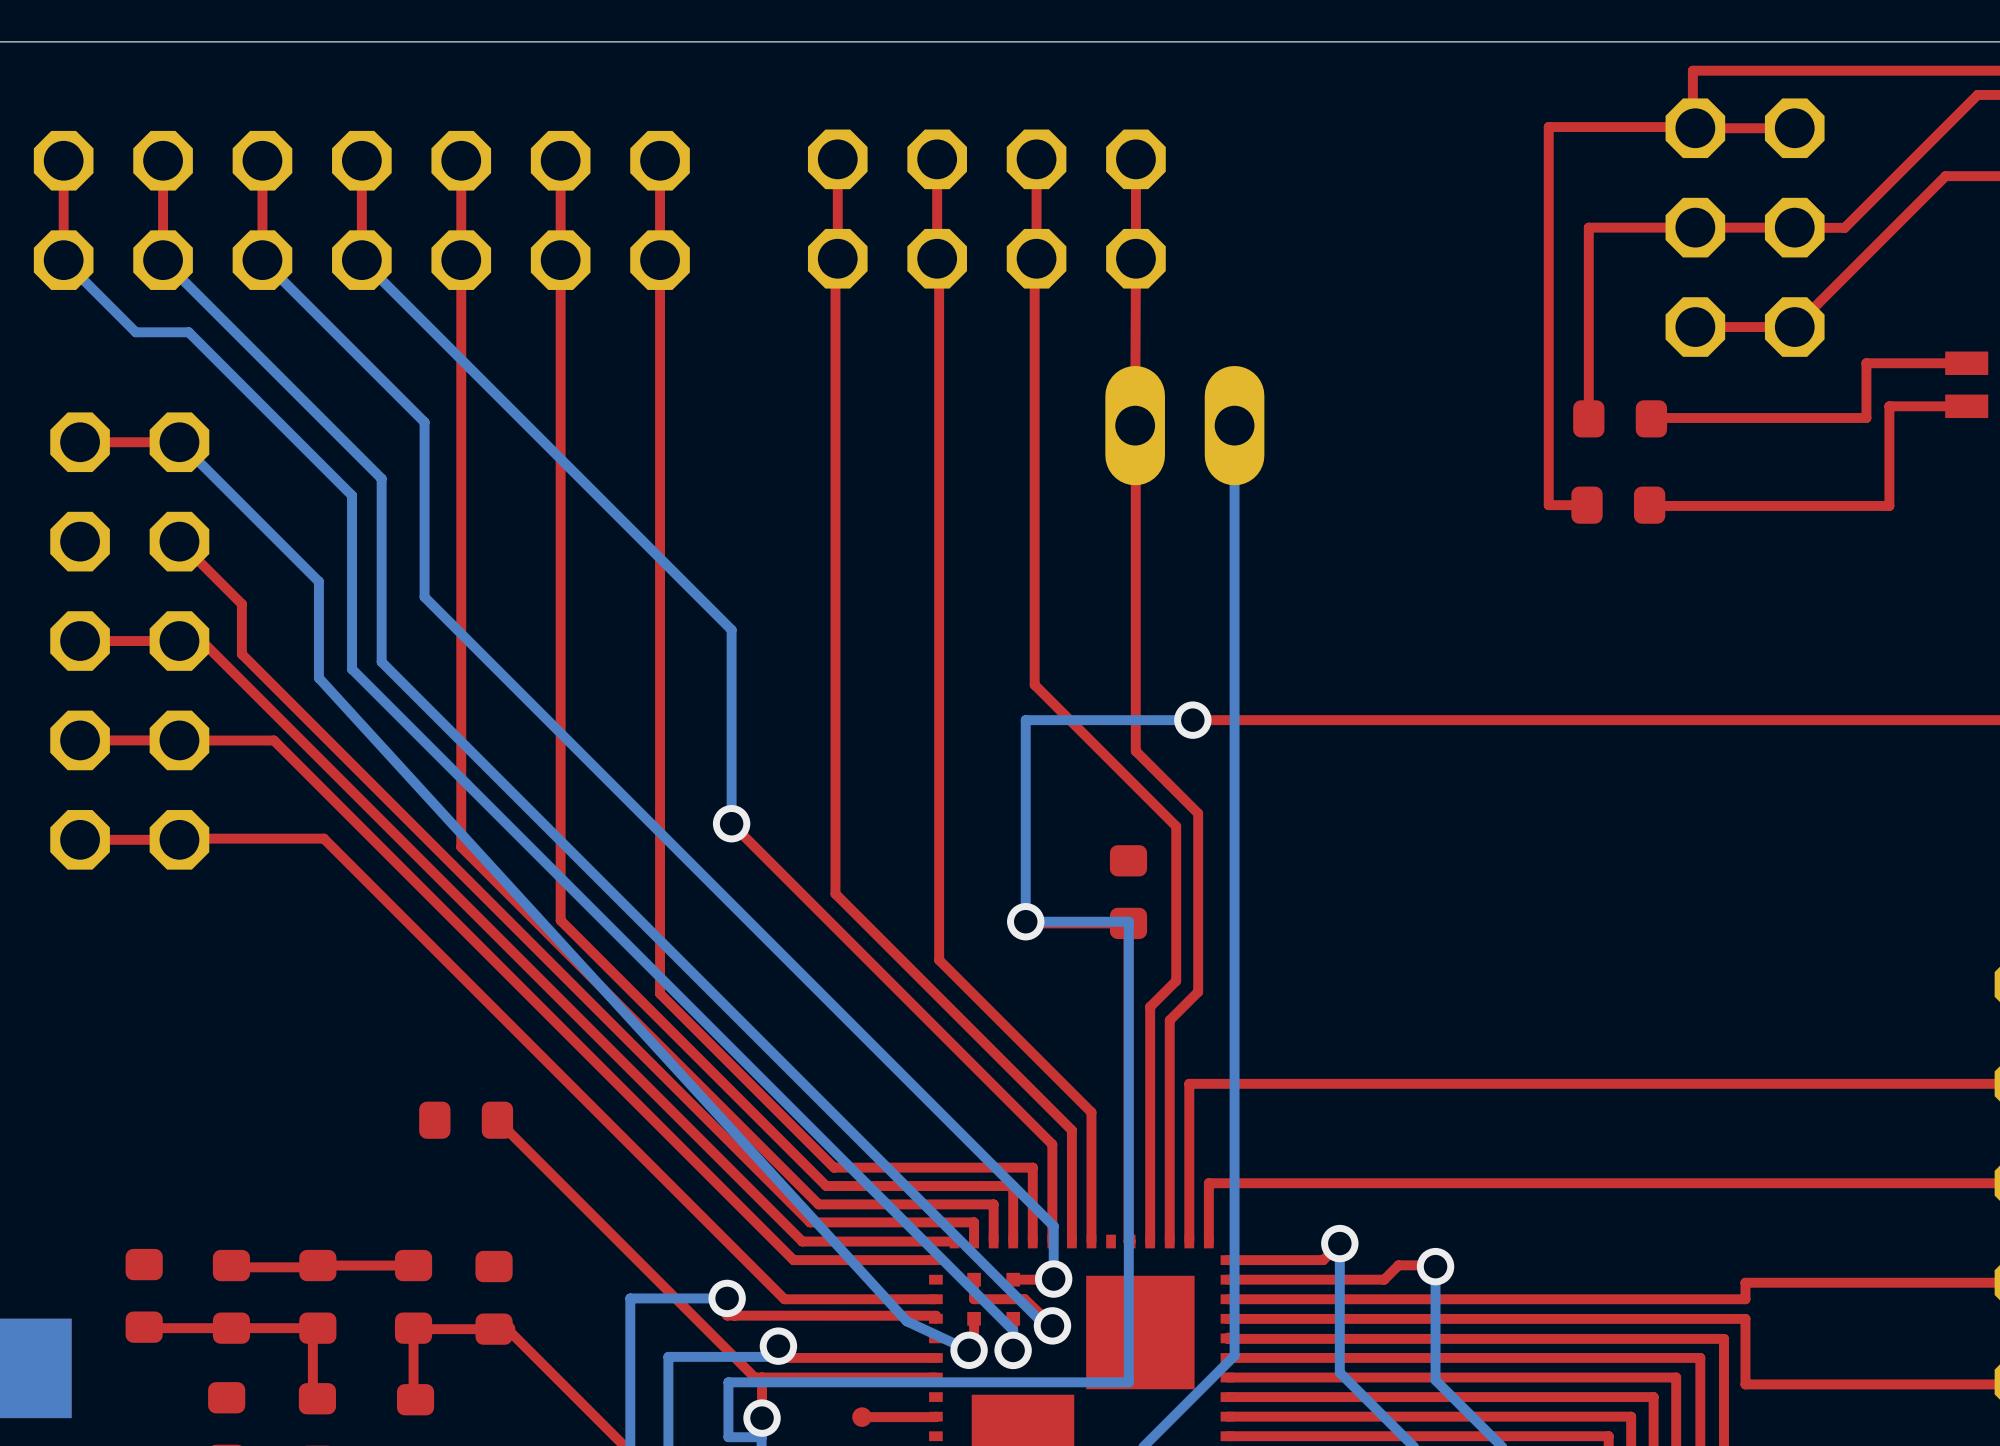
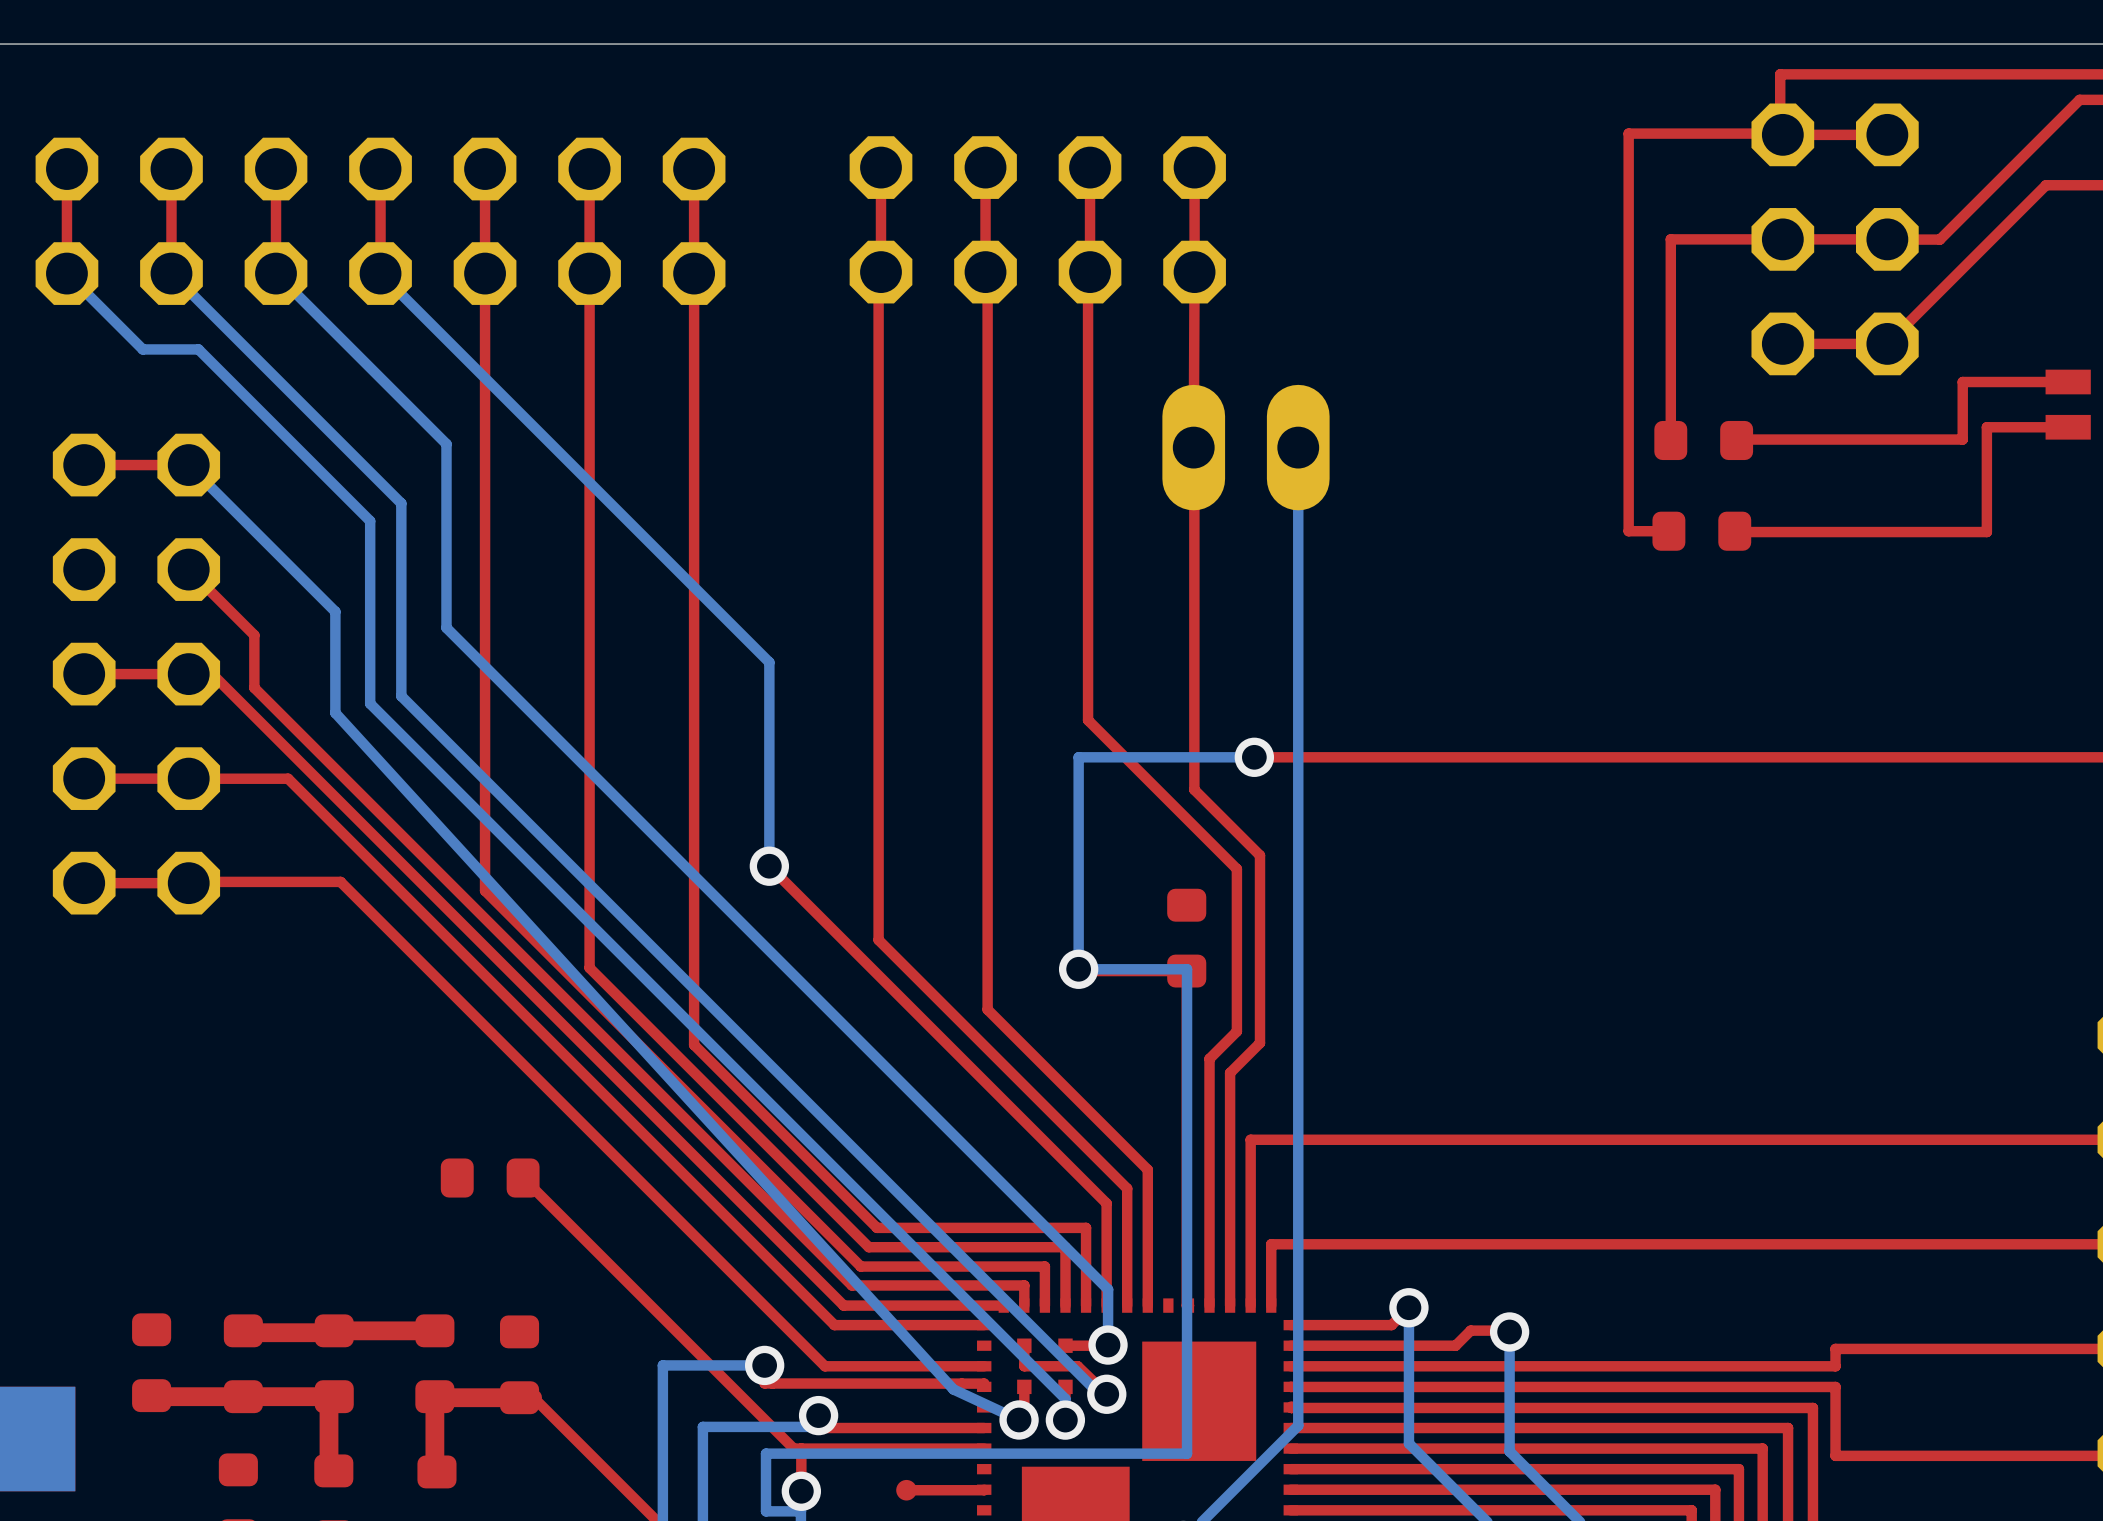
top track width: thin (413, 1265) (317, 1265) -> thick (434, 1330) (334, 1330)
top track width: thin (313, 1267) (233, 1267) -> thick (329, 1332) (245, 1332)
top track width: thin (315, 1328) (145, 1328) -> thick (331, 1396) (152, 1396)
top track width: thin (494, 1329) (413, 1329) (413, 1399) -> thick (519, 1397) (434, 1397) (434, 1471)
top track width: thin (312, 1330) (312, 1394) -> thick (329, 1399) (329, 1466)

